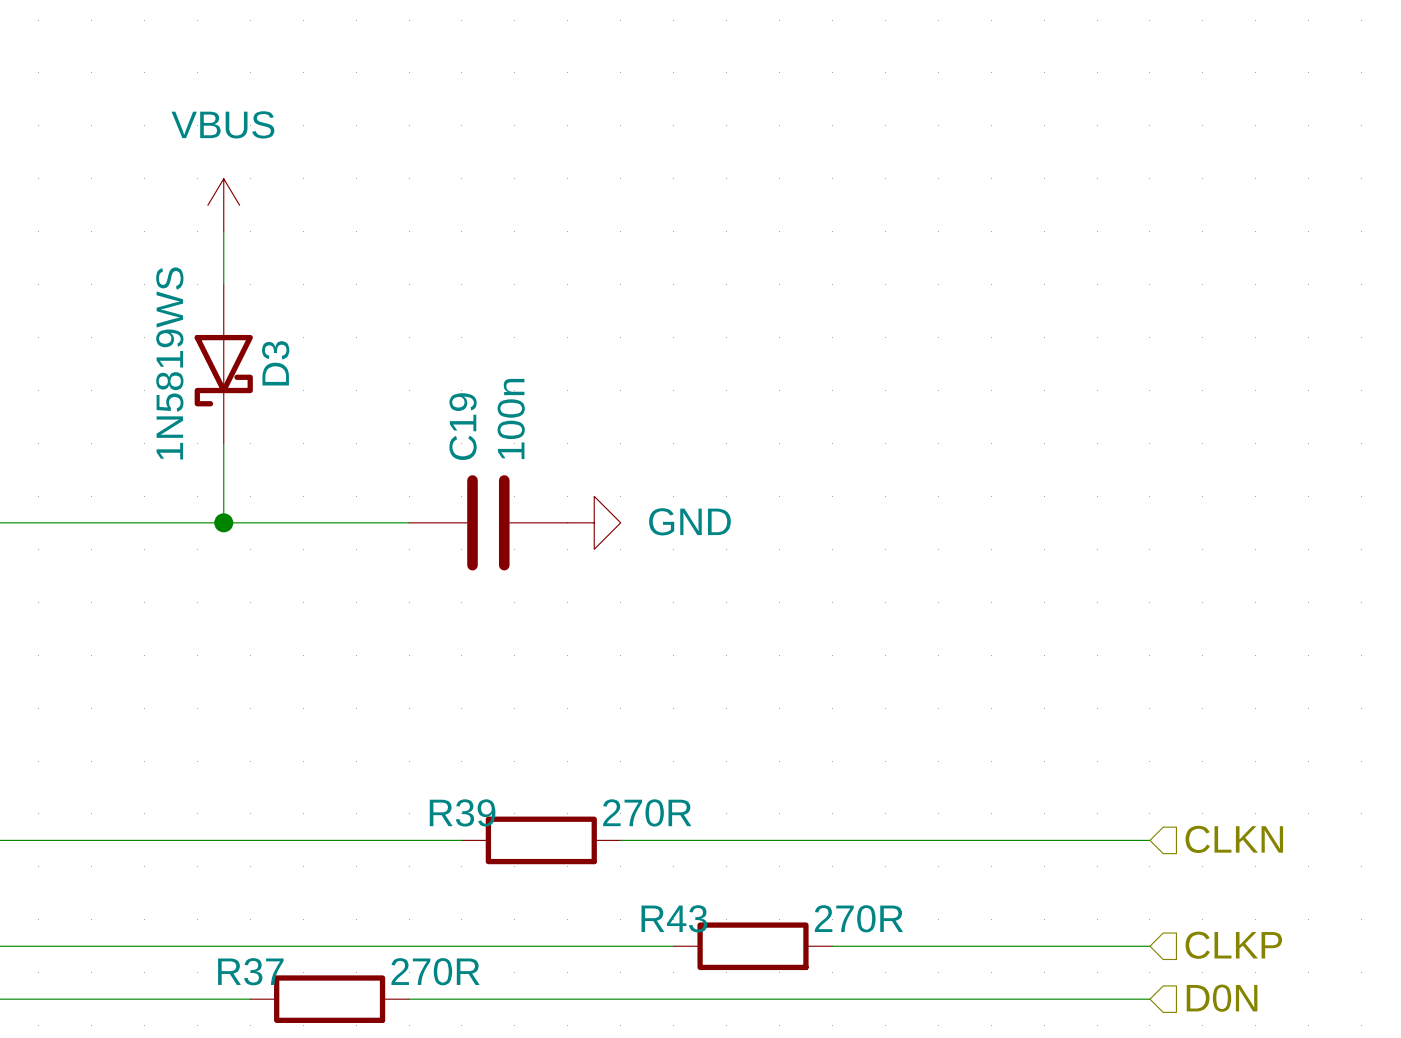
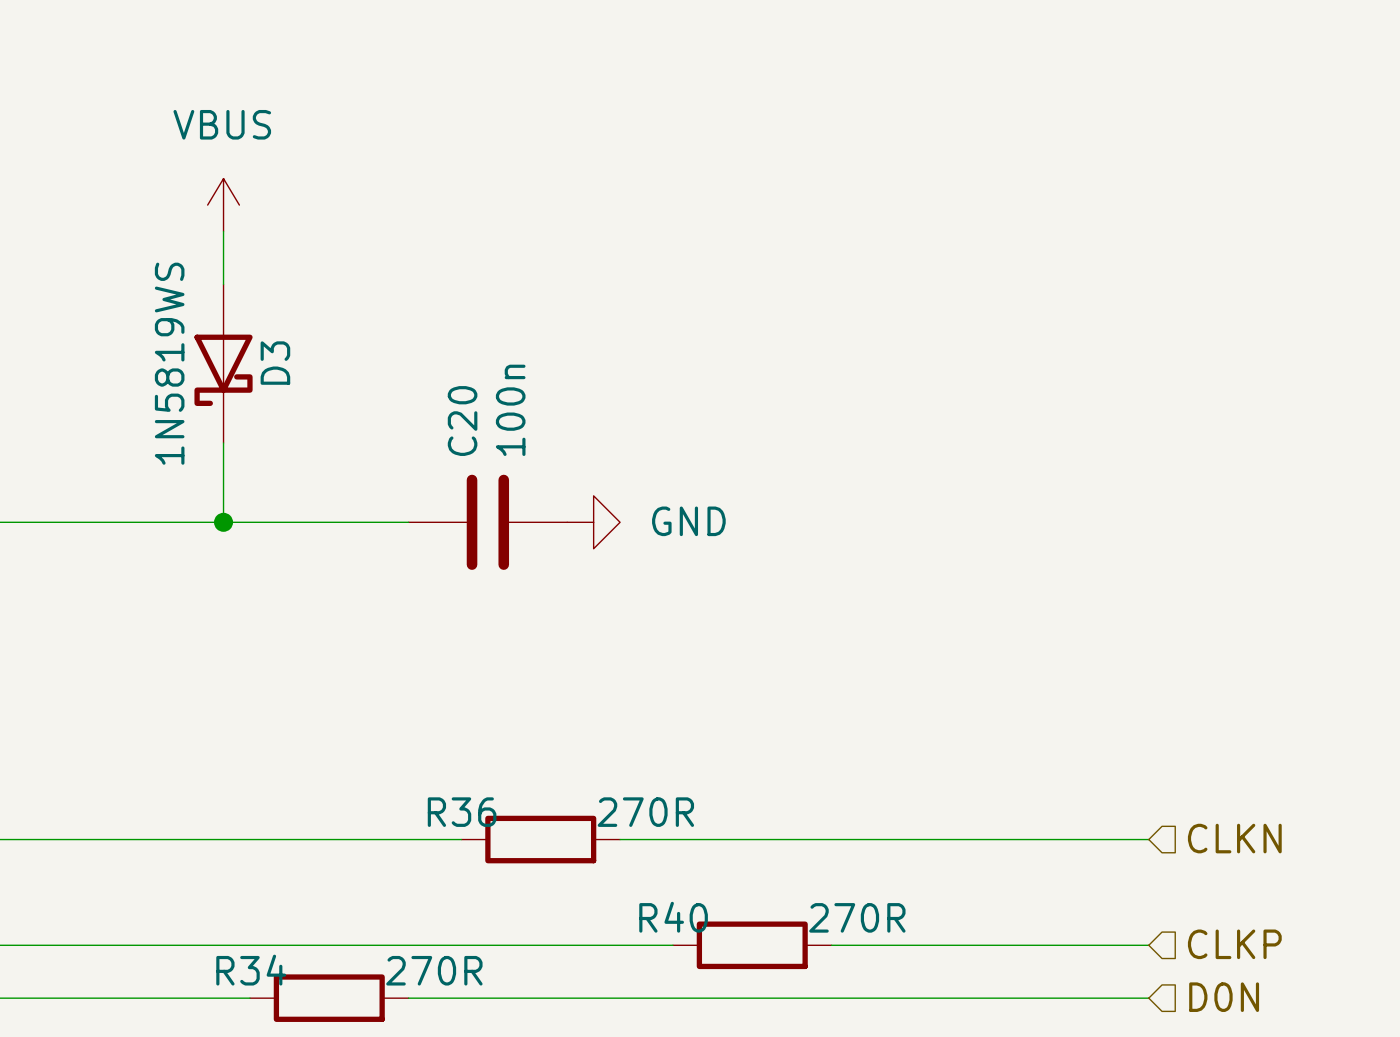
C19 name: C19 (463, 426) -> C20 (462, 421)
R39 name: R39 (462, 812) -> R36 (462, 812)
R43 name: R43 (674, 918) -> R40 (673, 917)
R37 name: R37 (250, 971) -> R34 (251, 970)

